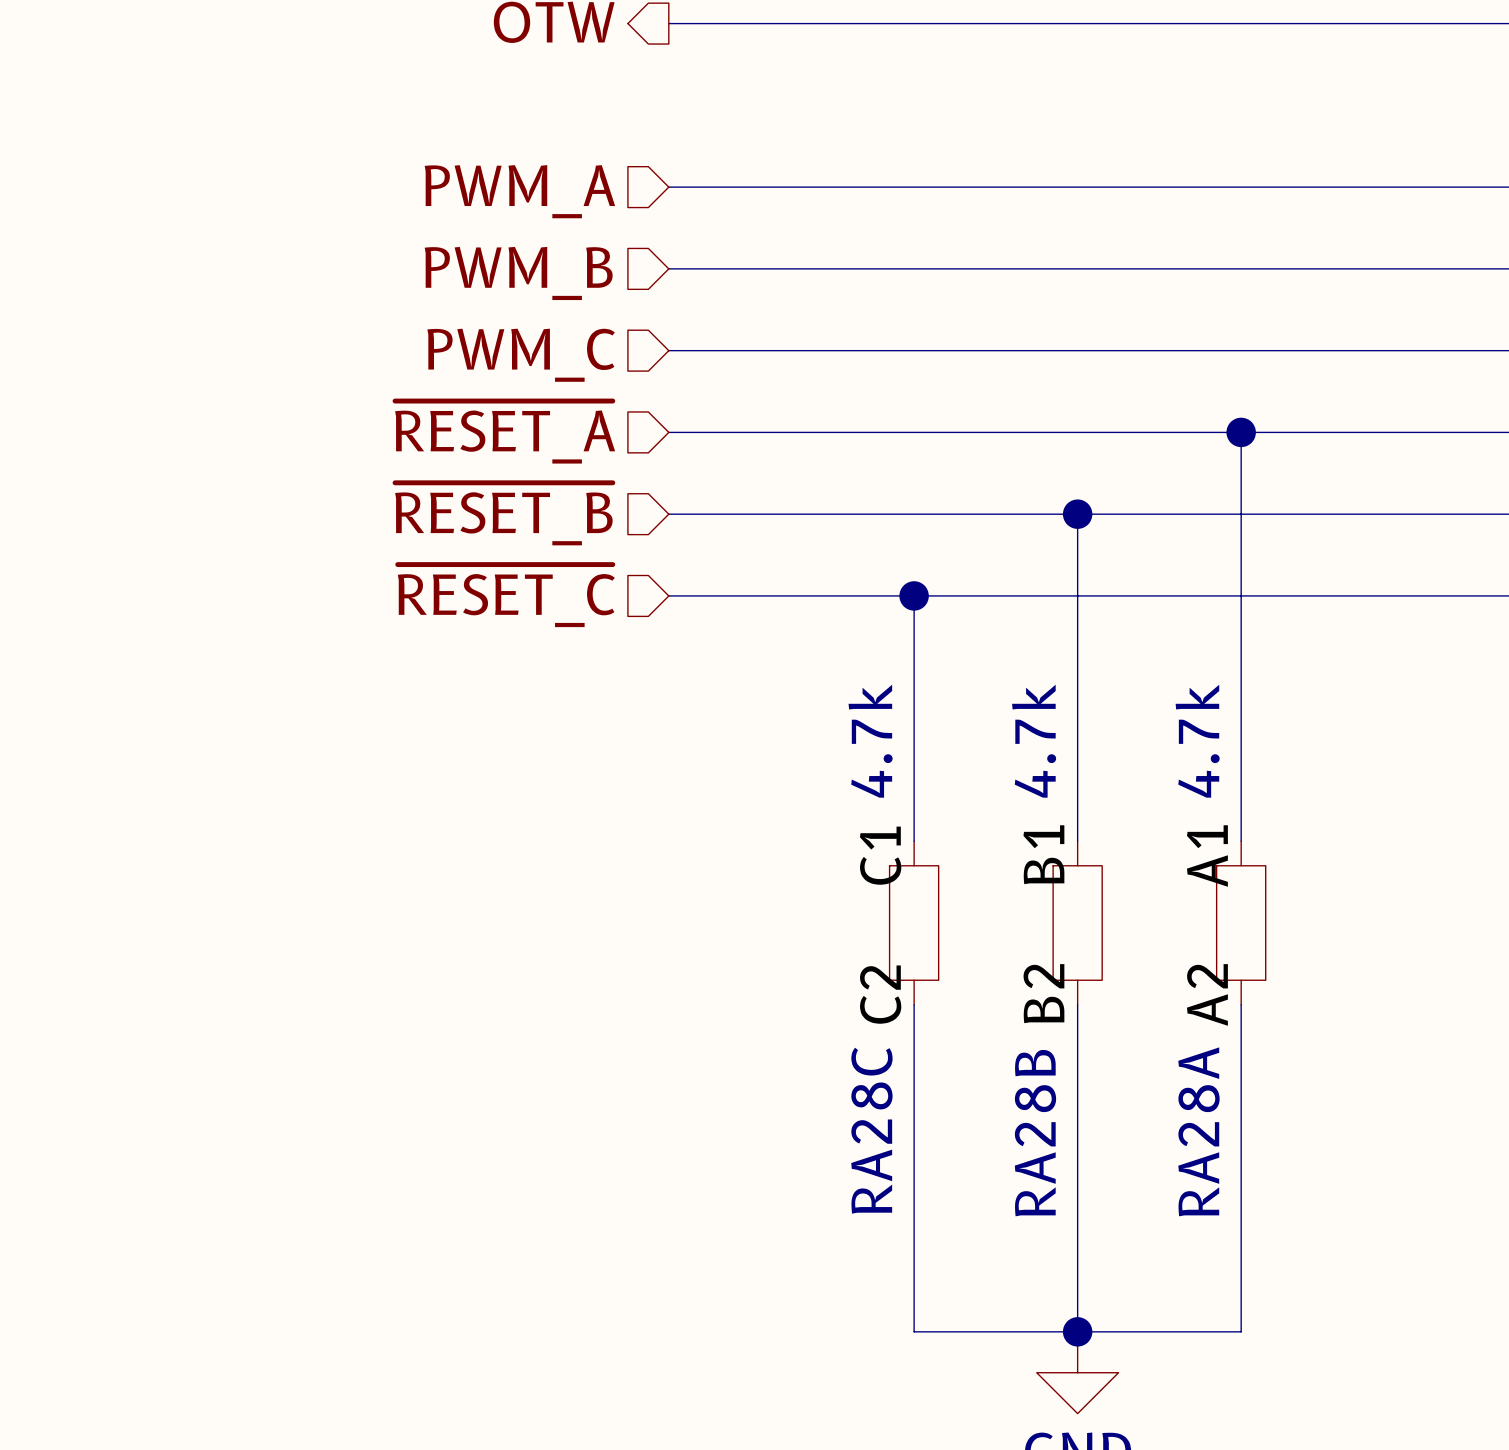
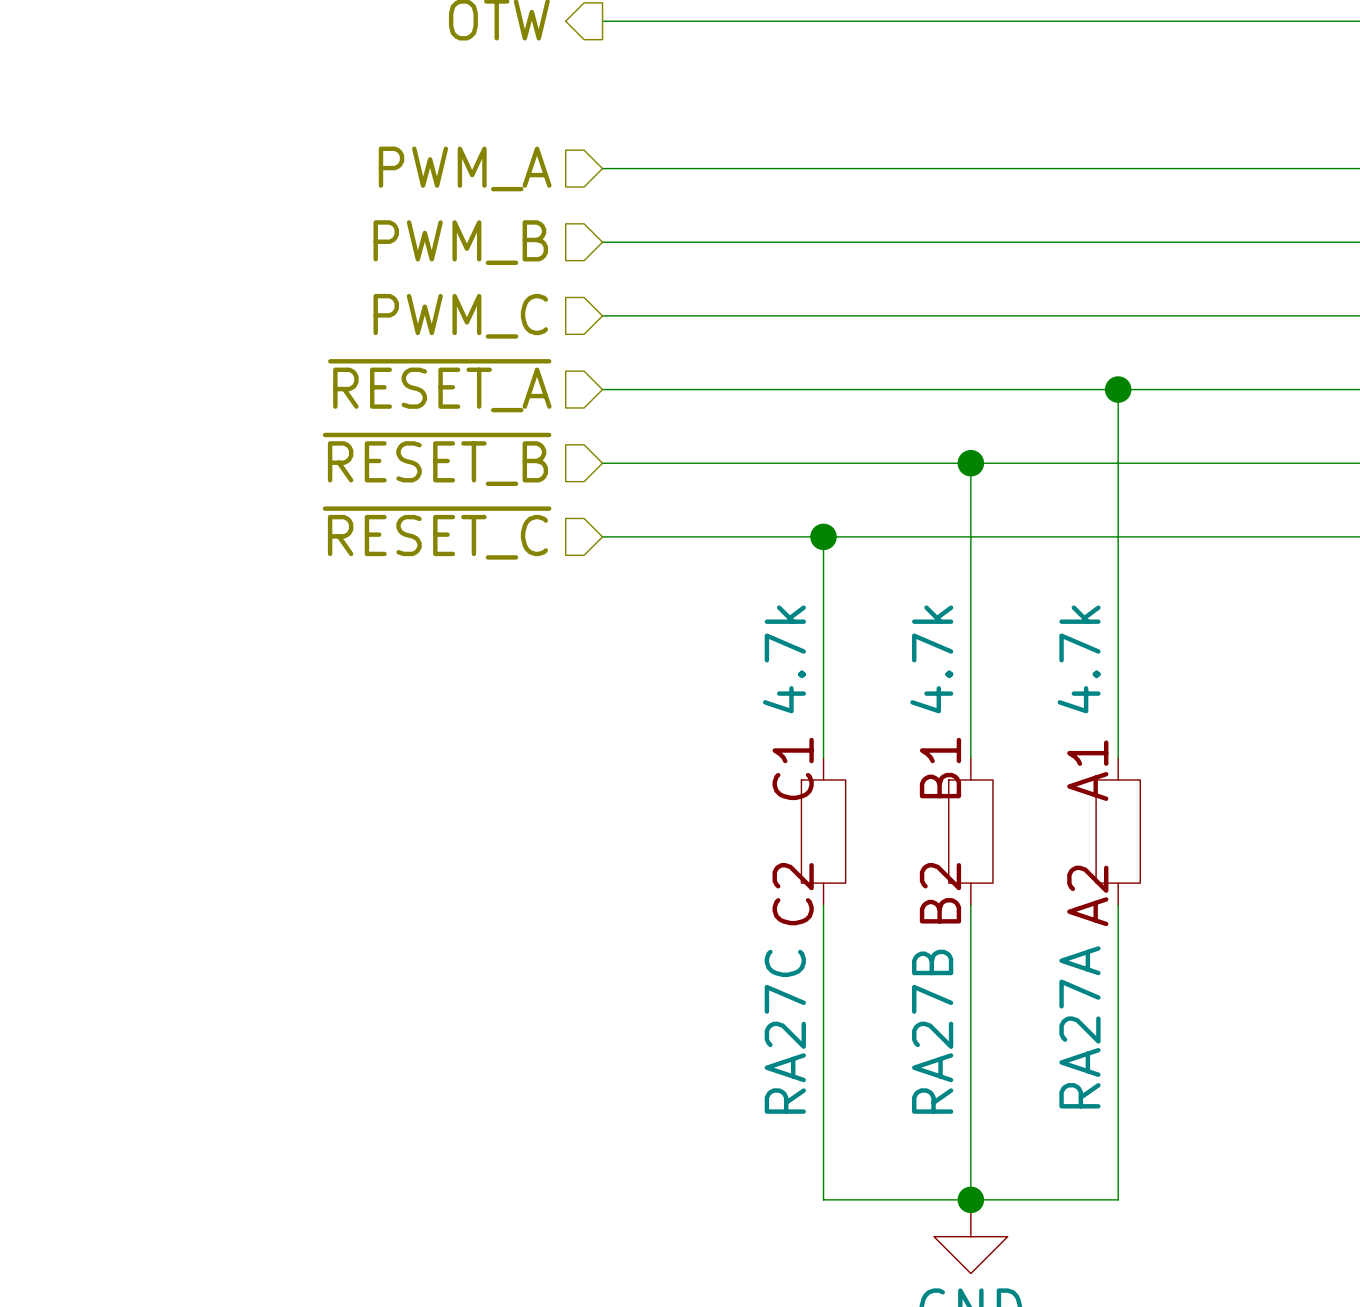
RA28C name: RA28C (871, 1130) -> RA27C (785, 1031)
RA28A name: RA28A (1198, 1131) -> RA27A (1079, 1027)
RA28B name: RA28B (1035, 1133) -> RA27B (932, 1031)

